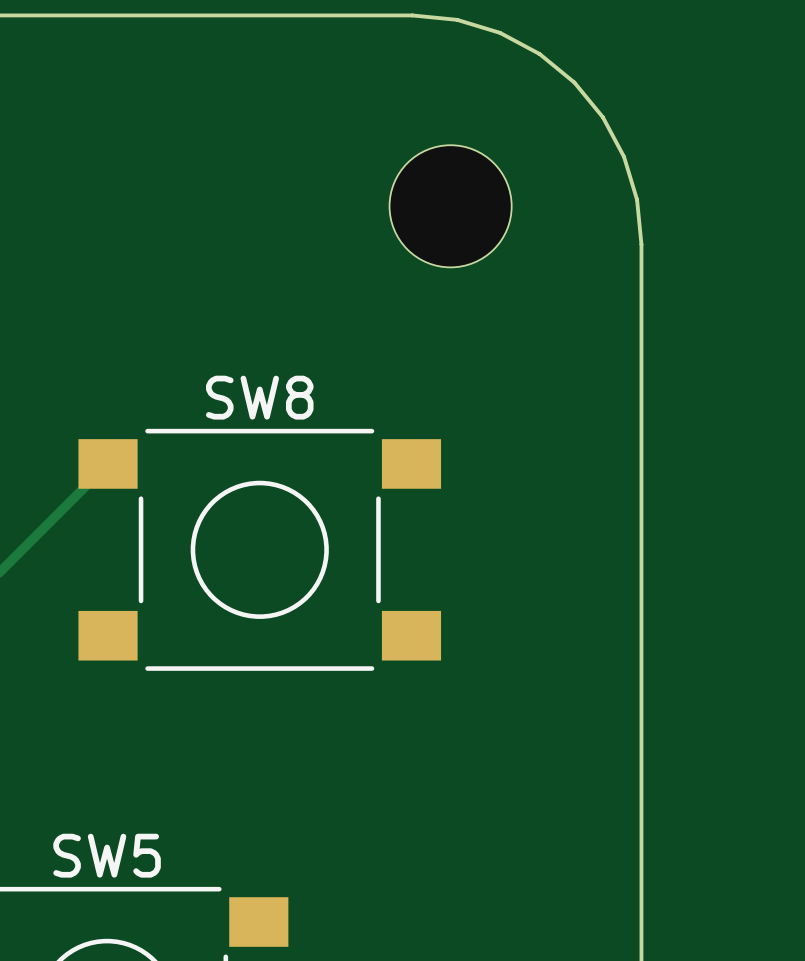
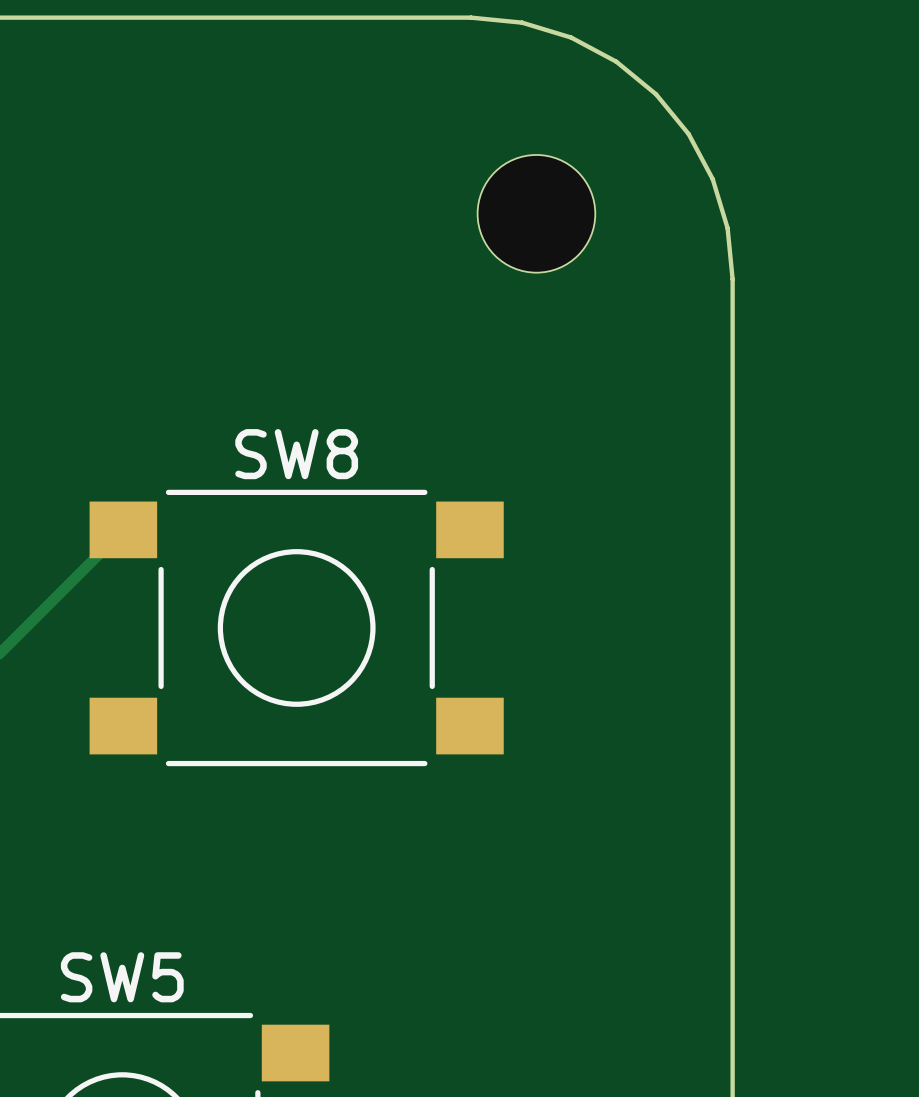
part footprint: [389, 145, 512, 268] -> [477, 154, 596, 273]

